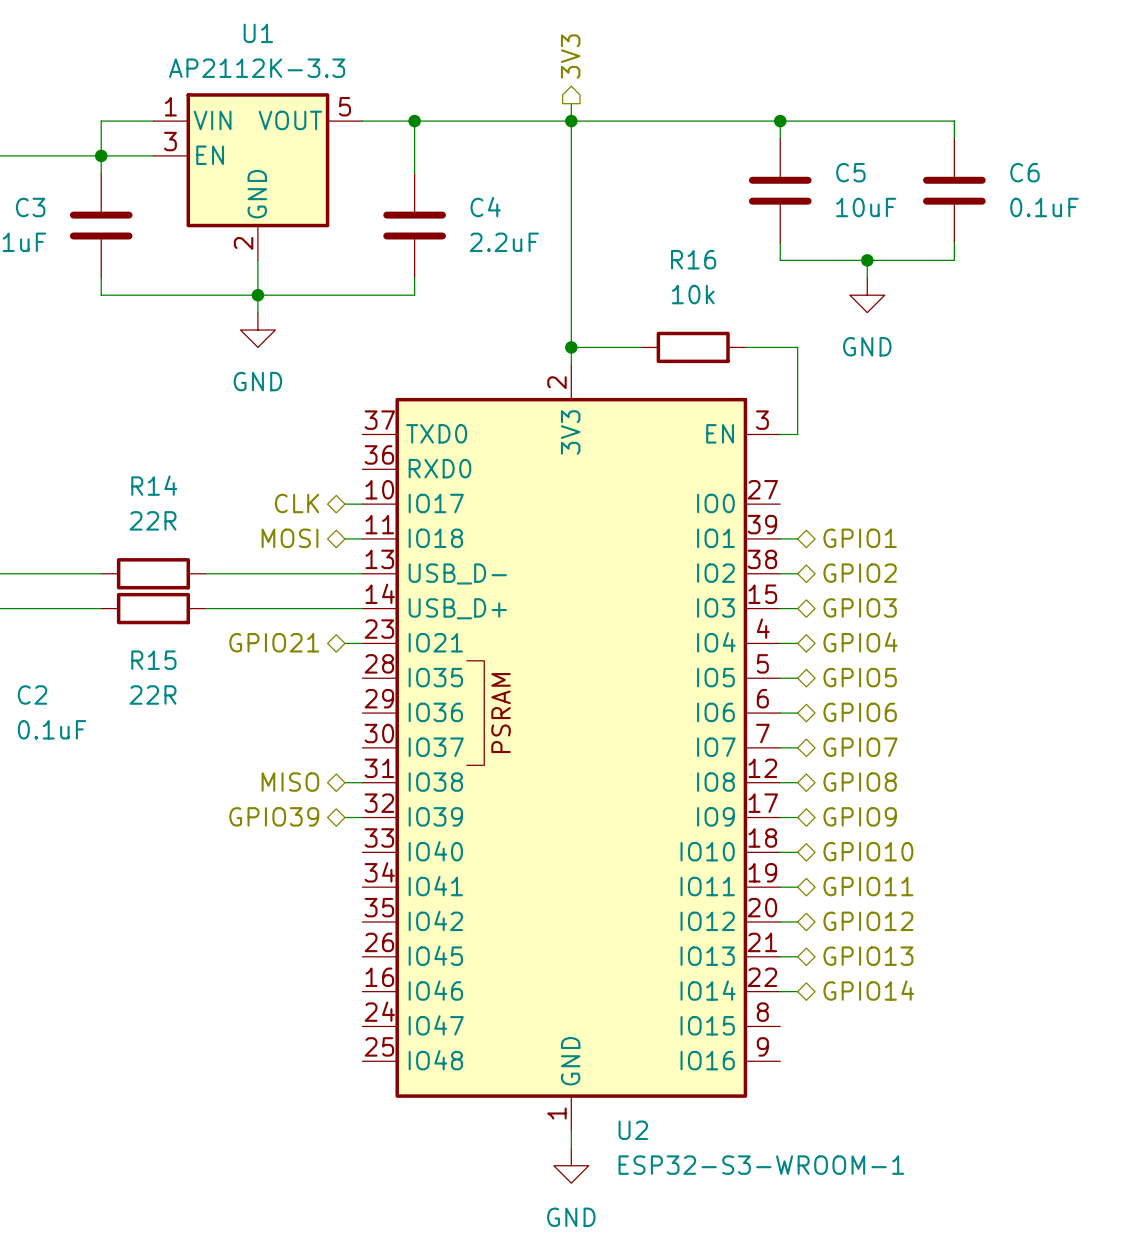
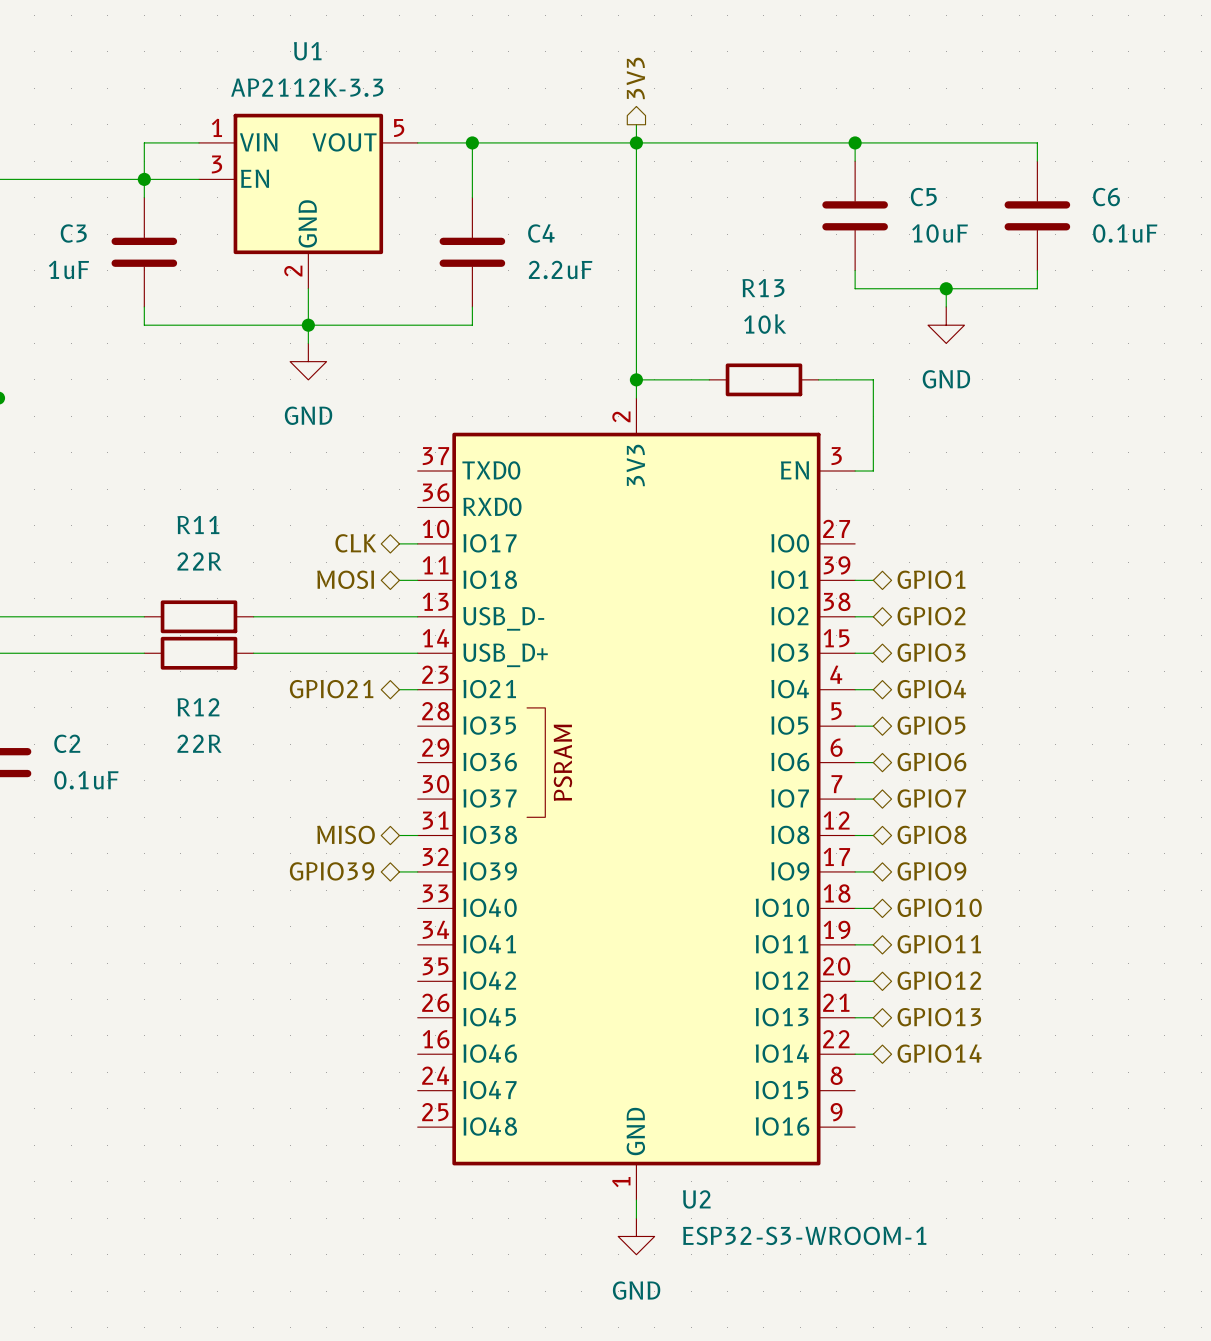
R16 name: R16 (693, 259) -> R13 (763, 288)
R14 name: R14 (154, 485) -> R11 (198, 524)
R15 name: R15 (153, 660) -> R12 (198, 707)

